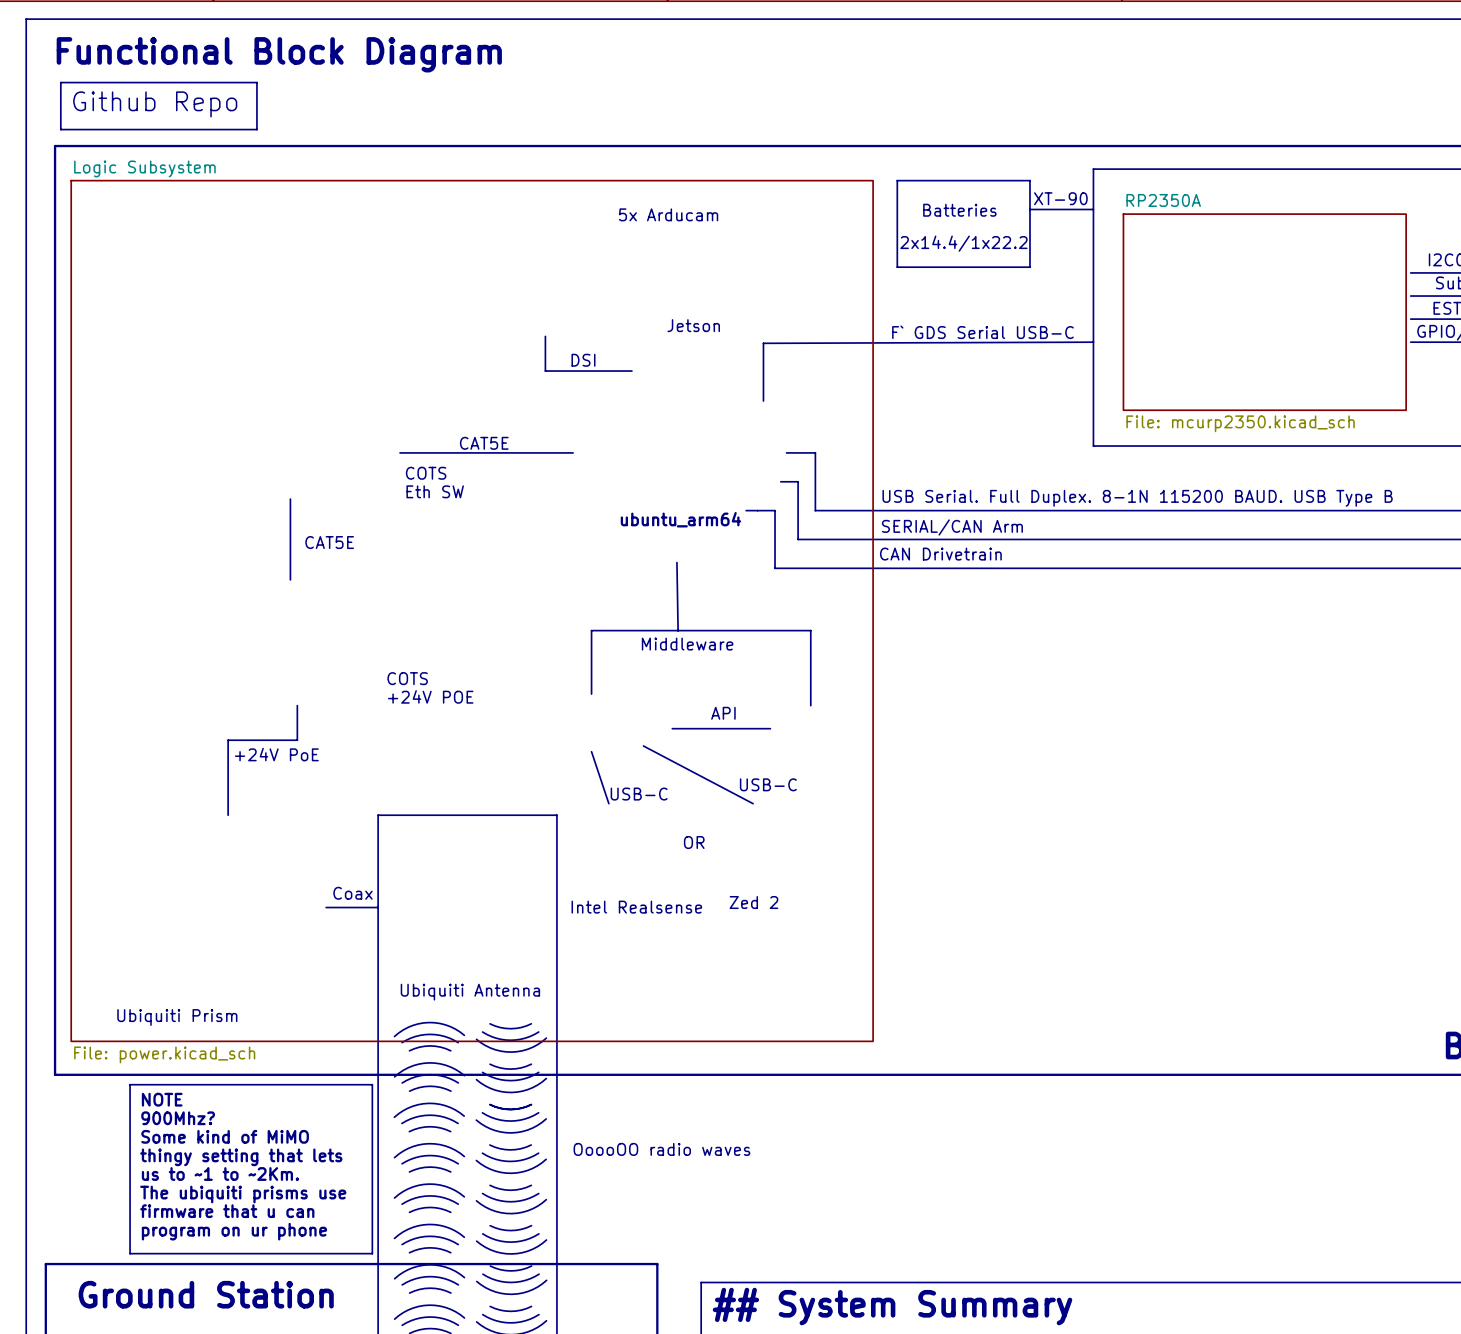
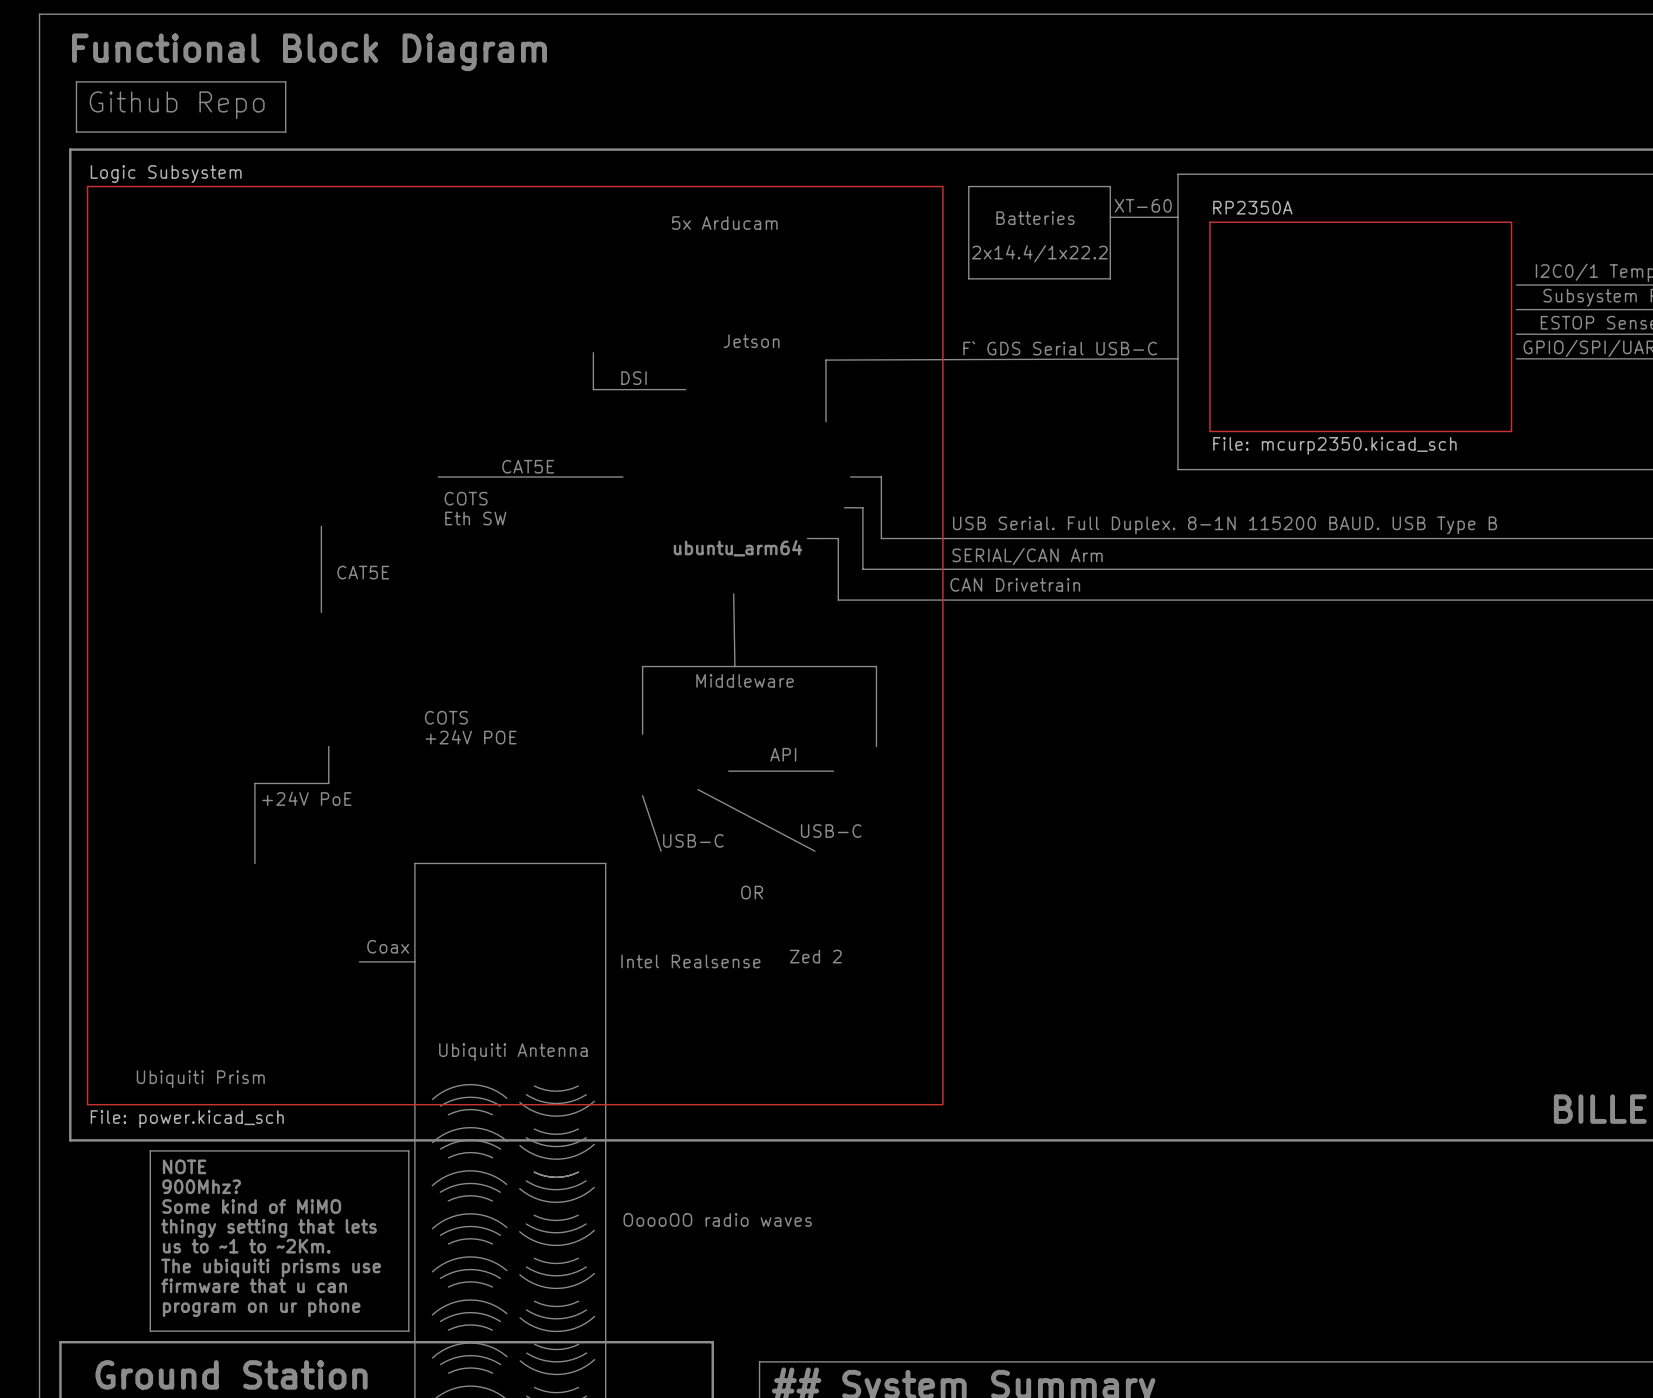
text: XT-90 (1060, 198) -> XT-60 (1143, 205)

